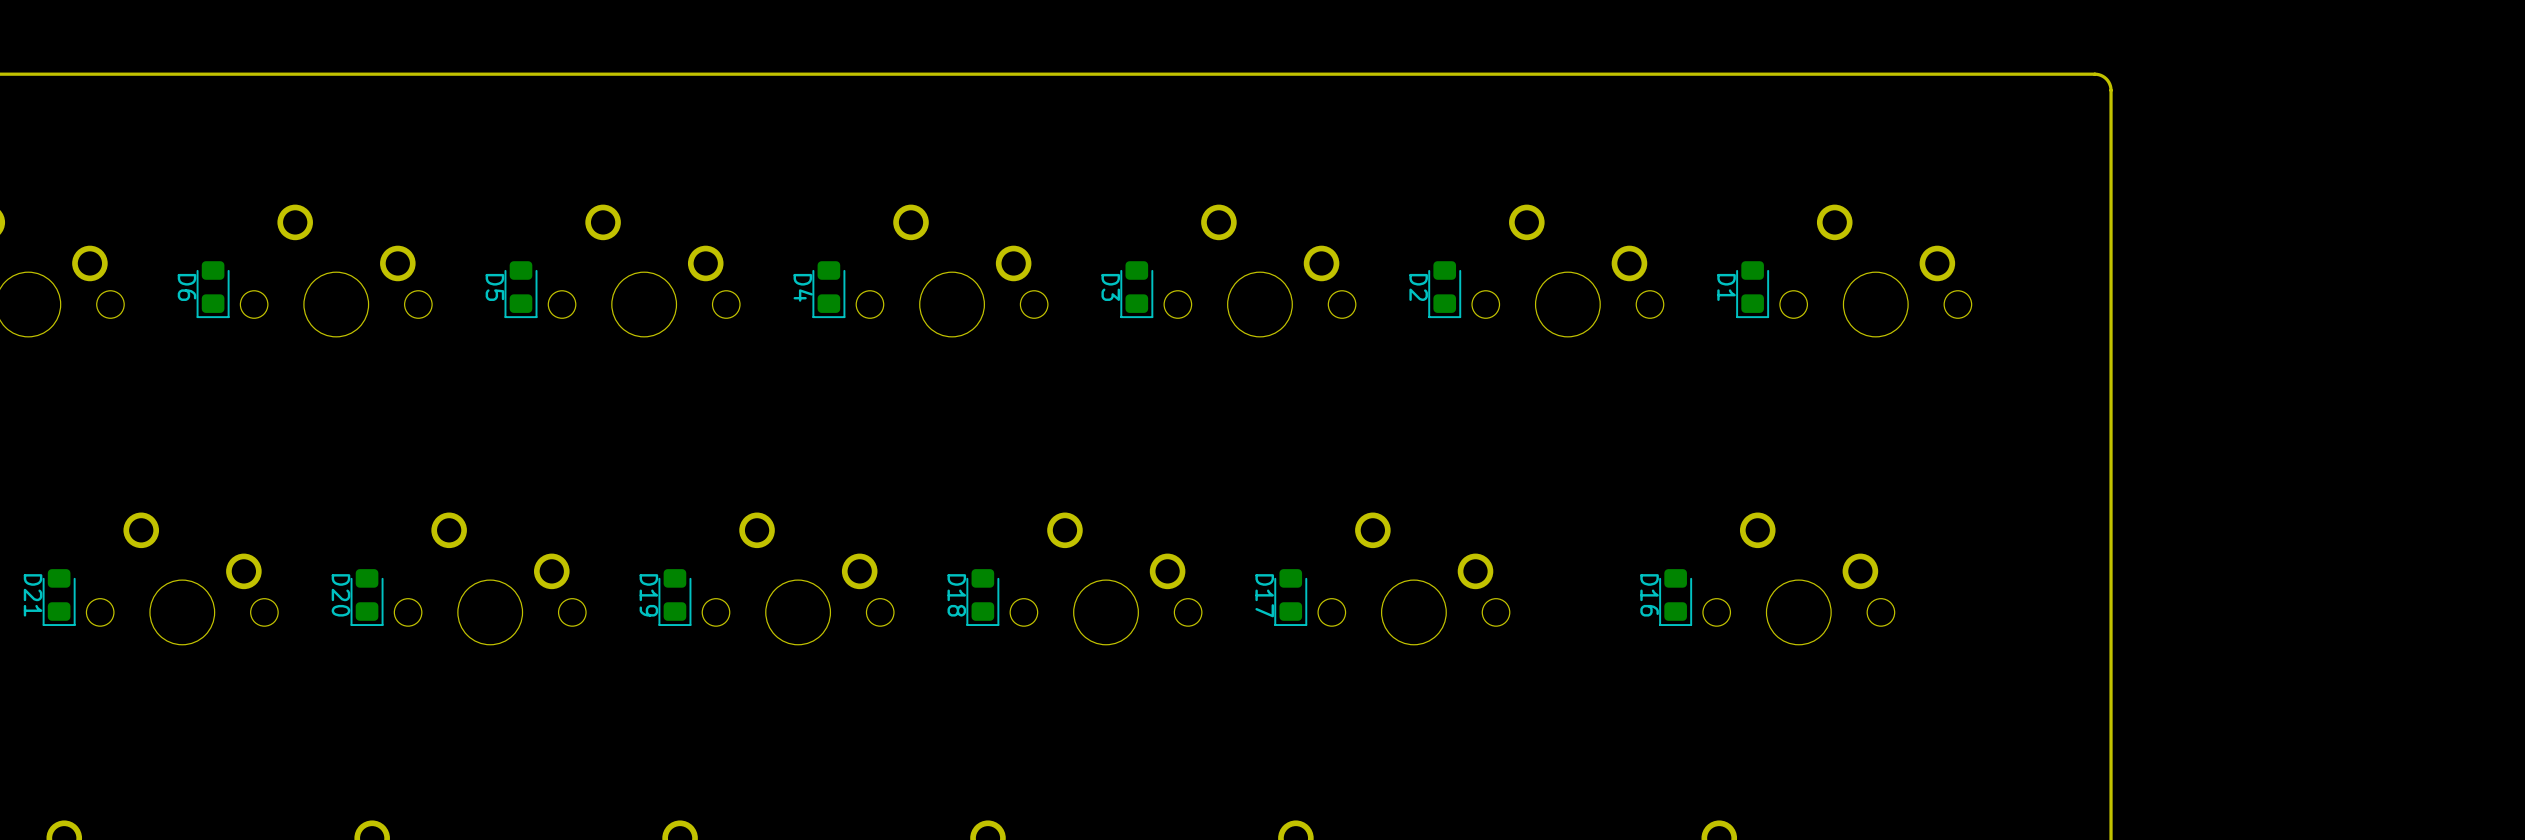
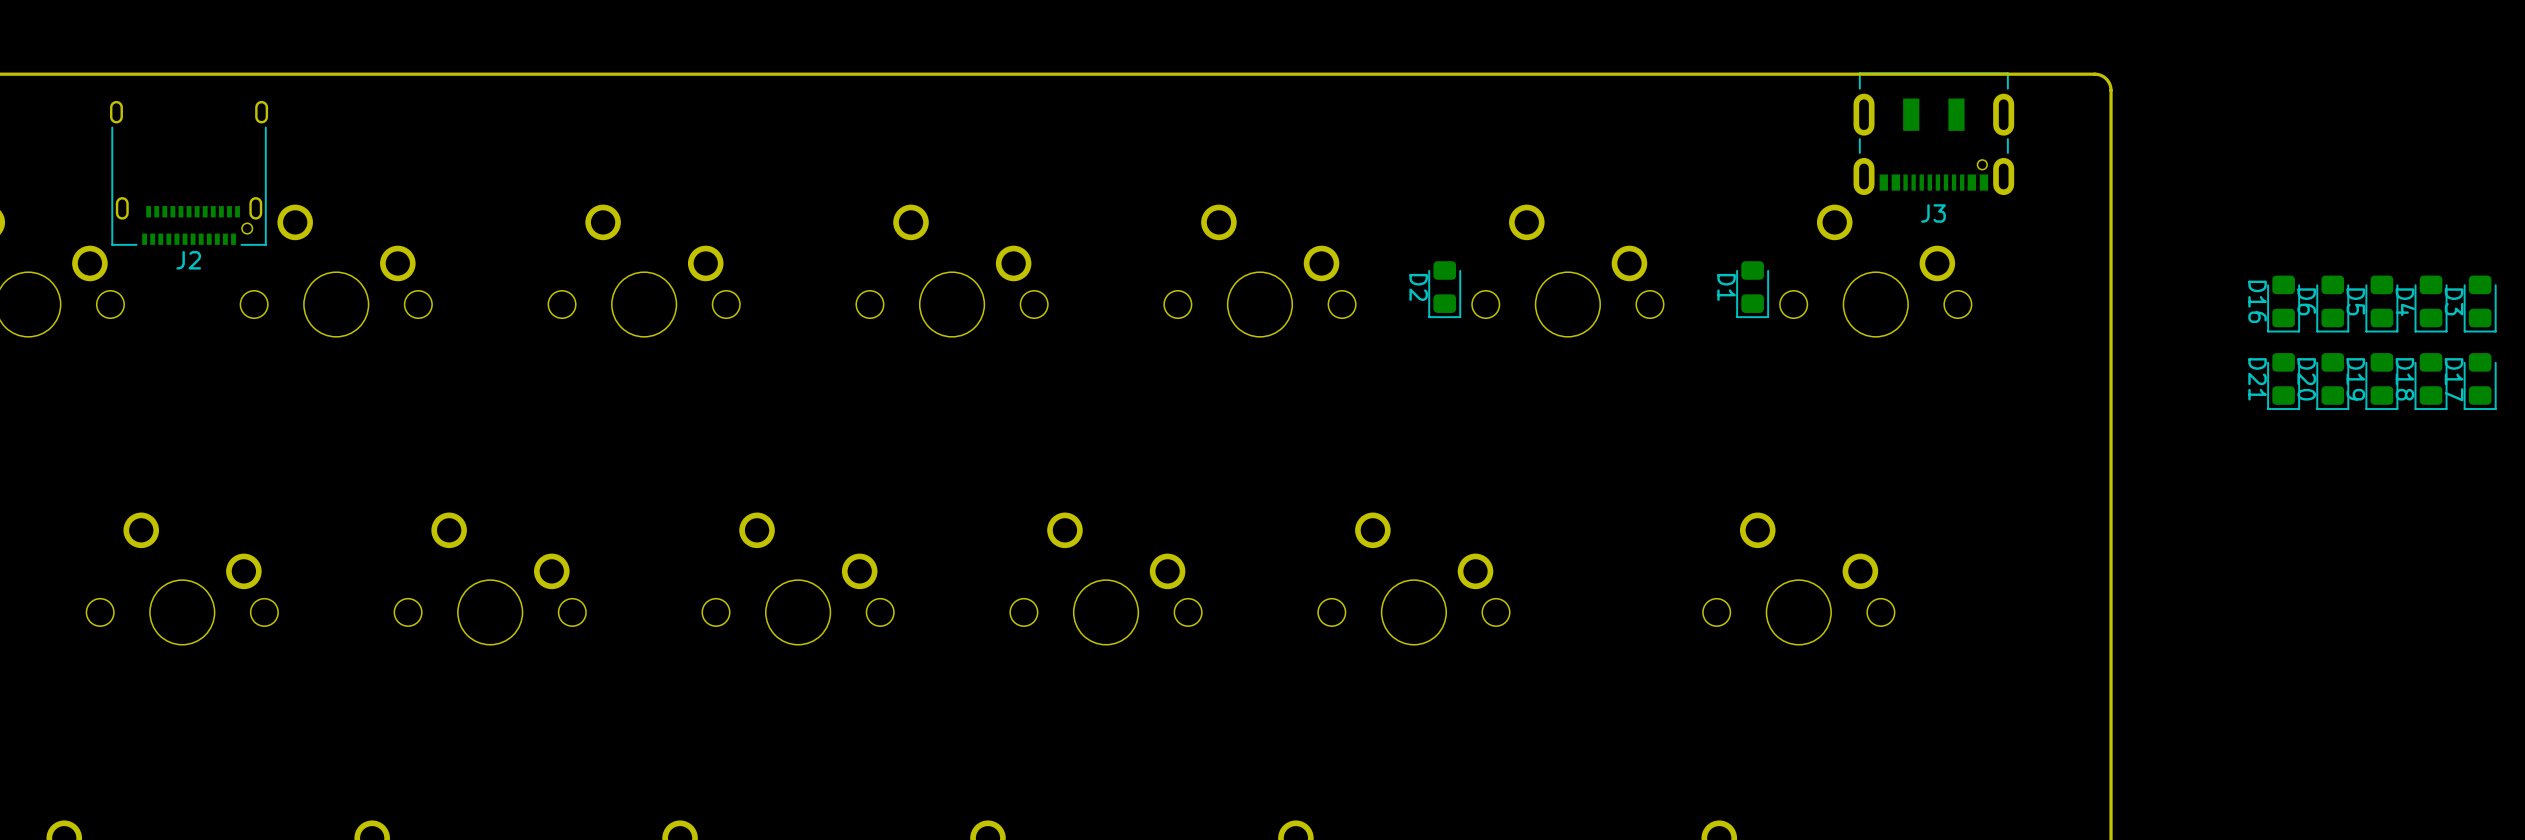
J3: none -> (1933, 133)
J2: none -> (189, 173)
D6 position: (213, 289) -> (2332, 304)
D5 position: (520, 289) -> (2381, 304)
D4 position: (828, 289) -> (2431, 304)
D3 position: (1136, 289) -> (2480, 304)
D21 position: (59, 597) -> (2283, 381)
D20 position: (367, 597) -> (2332, 381)
D19 position: (674, 597) -> (2381, 381)
D18 position: (982, 597) -> (2431, 381)
D17 position: (1290, 597) -> (2480, 381)
D16 position: (1675, 597) -> (2283, 304)

